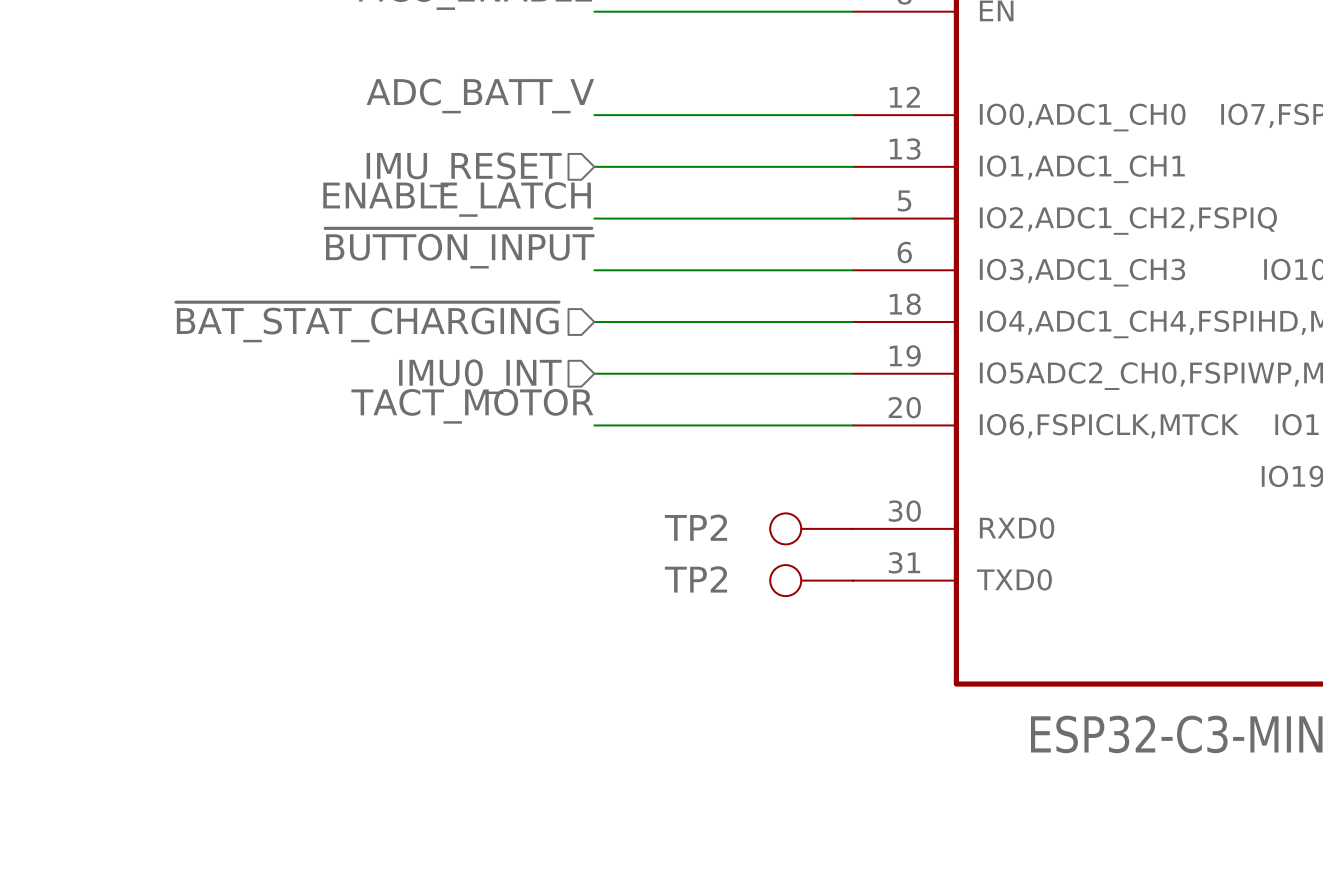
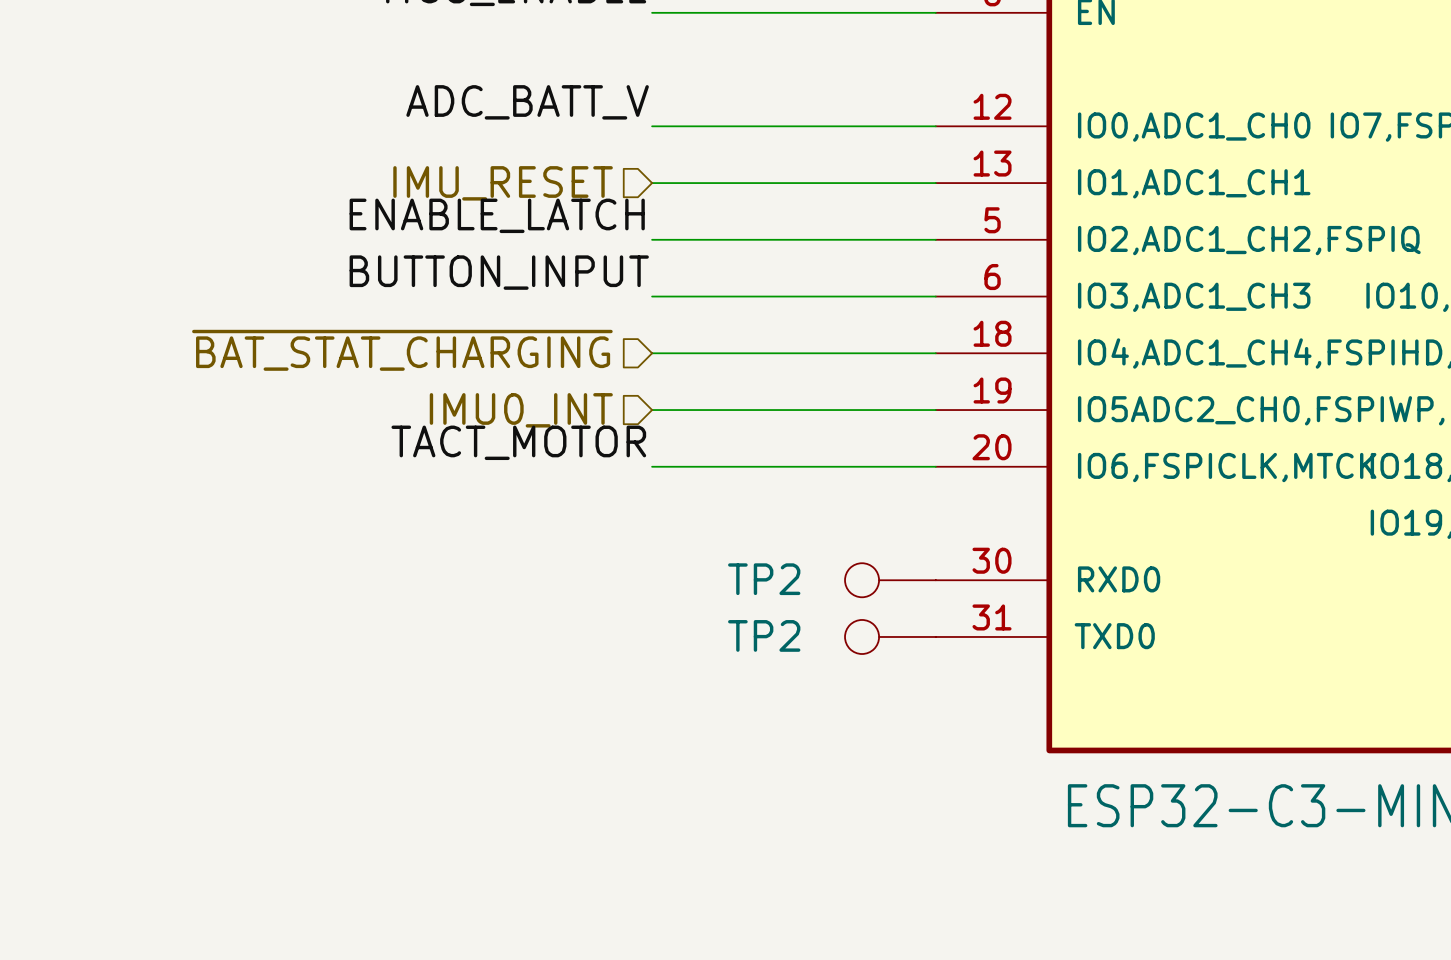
label: ~{BUTTON_INPUT} (459, 248) -> BUTTON_INPUT (499, 272)

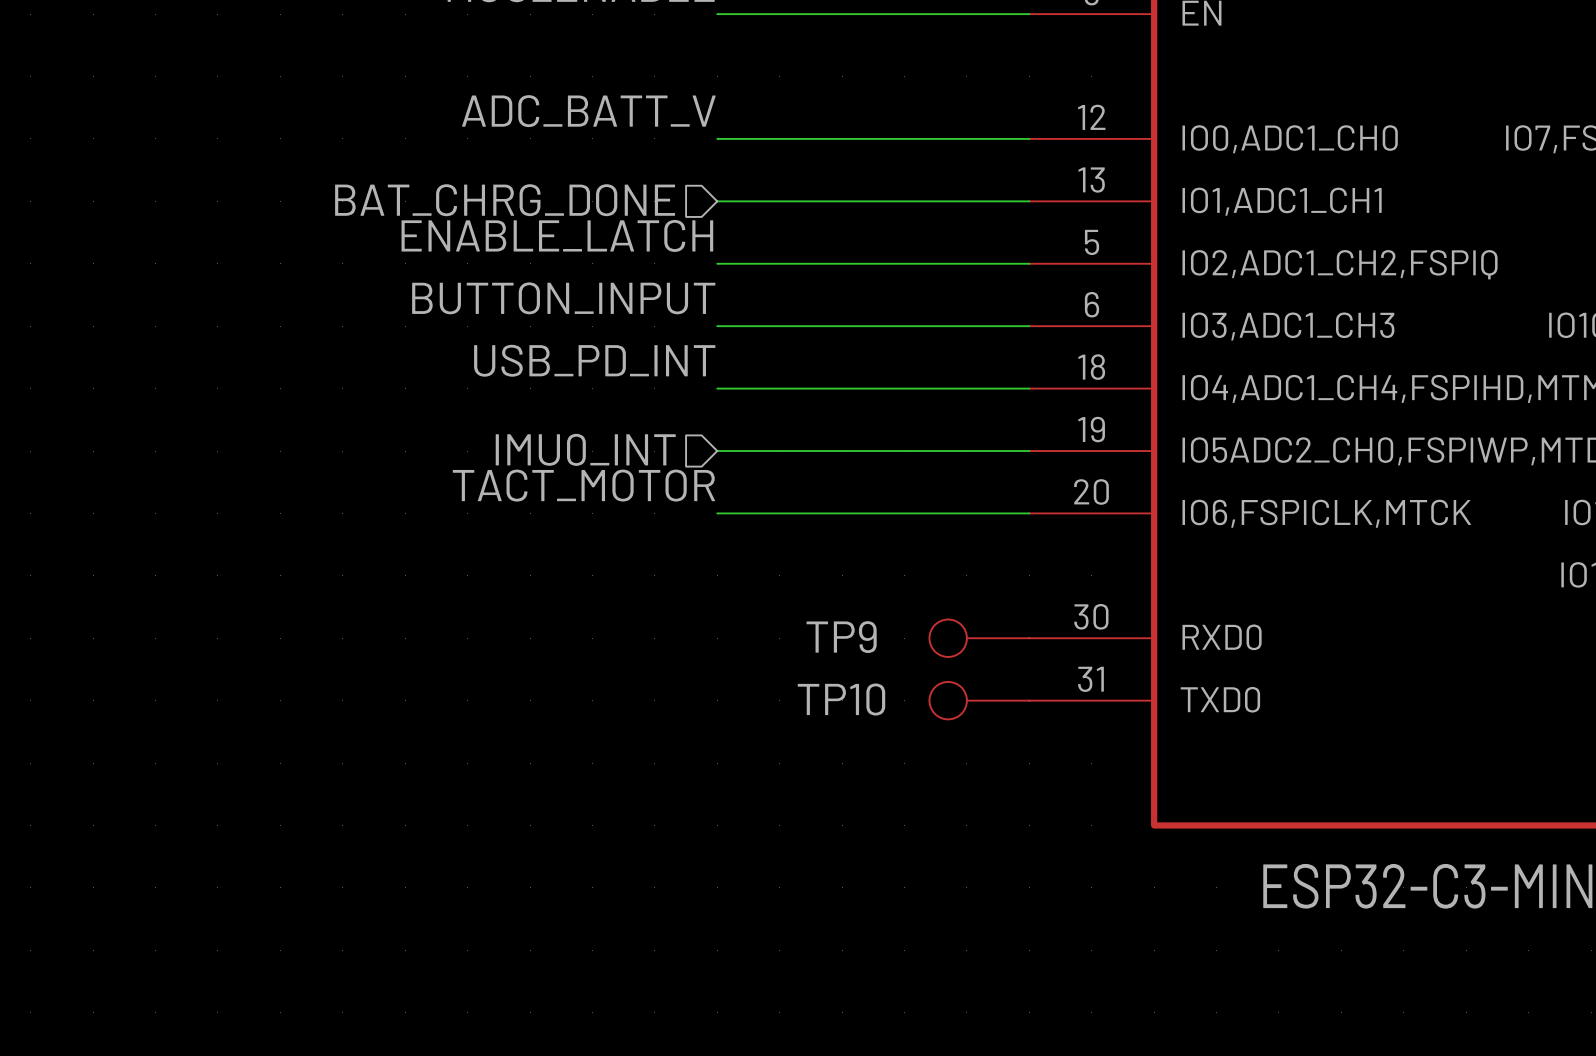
hierarchical label: IMU_RESET (503, 183) -> BAT_CHRG_DONE (505, 200)
label: none -> USB_PD_INT (594, 360)
hierarchical label: ~{BAT_STAT_CHARGING} (402, 350) -> none
TP2 name: TP2 (764, 579) -> TP9 (841, 637)
TP2 name: TP2 (764, 635) -> TP10 (841, 699)

